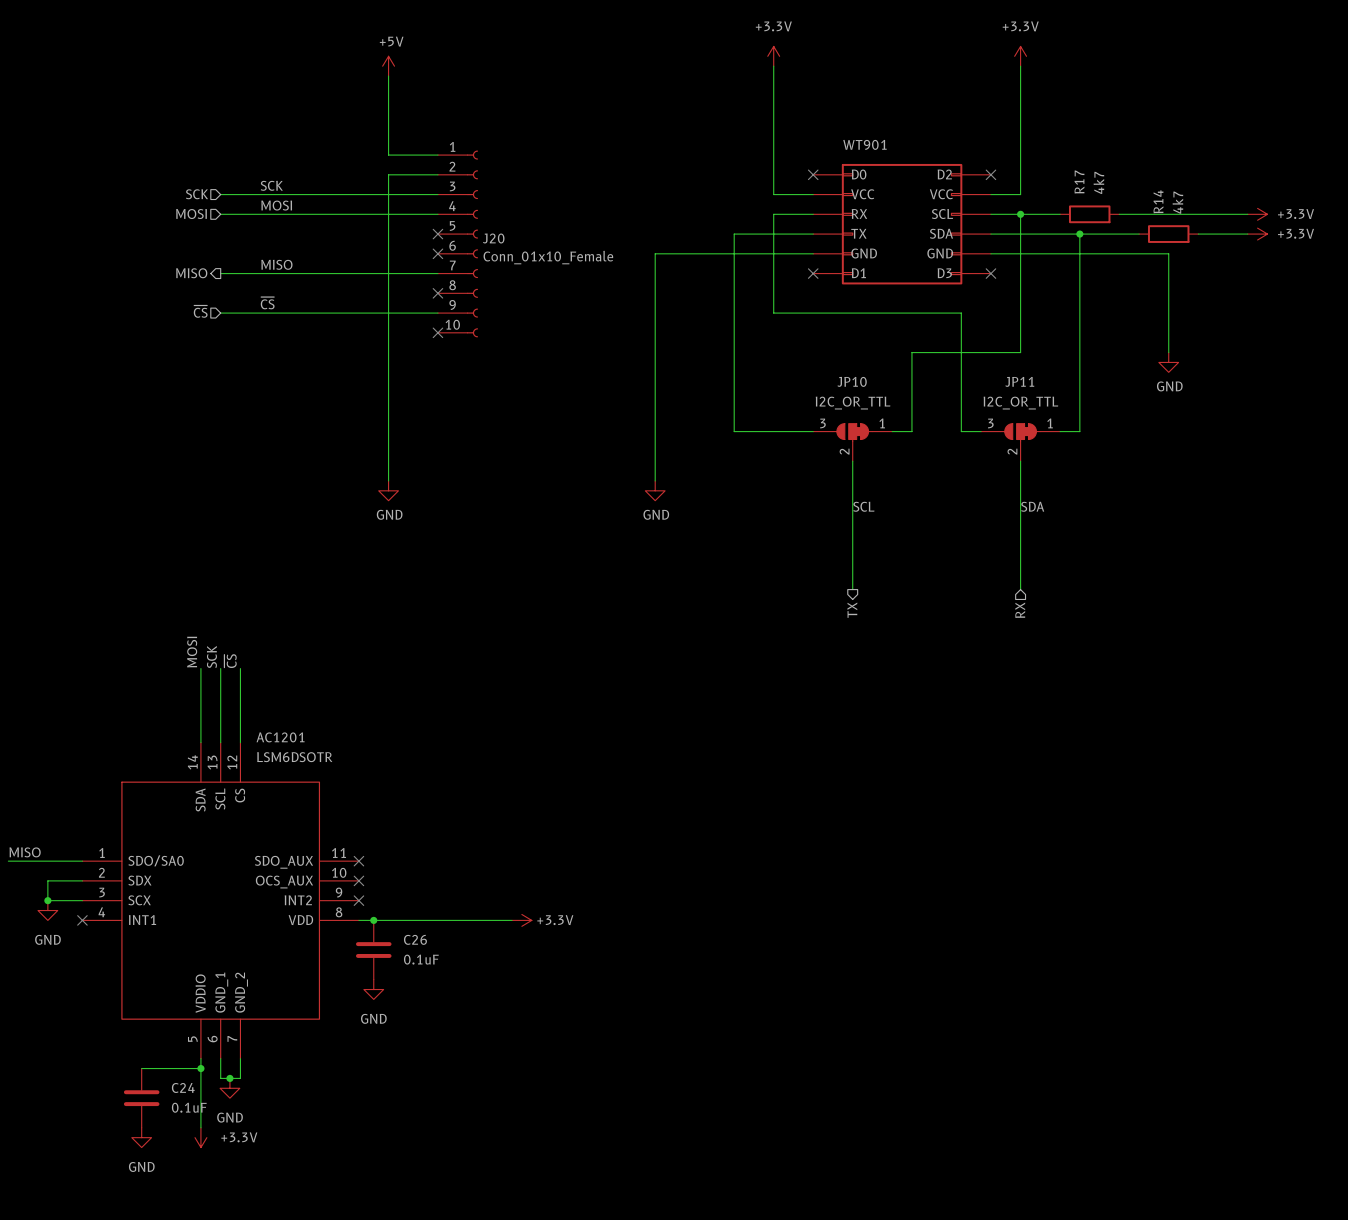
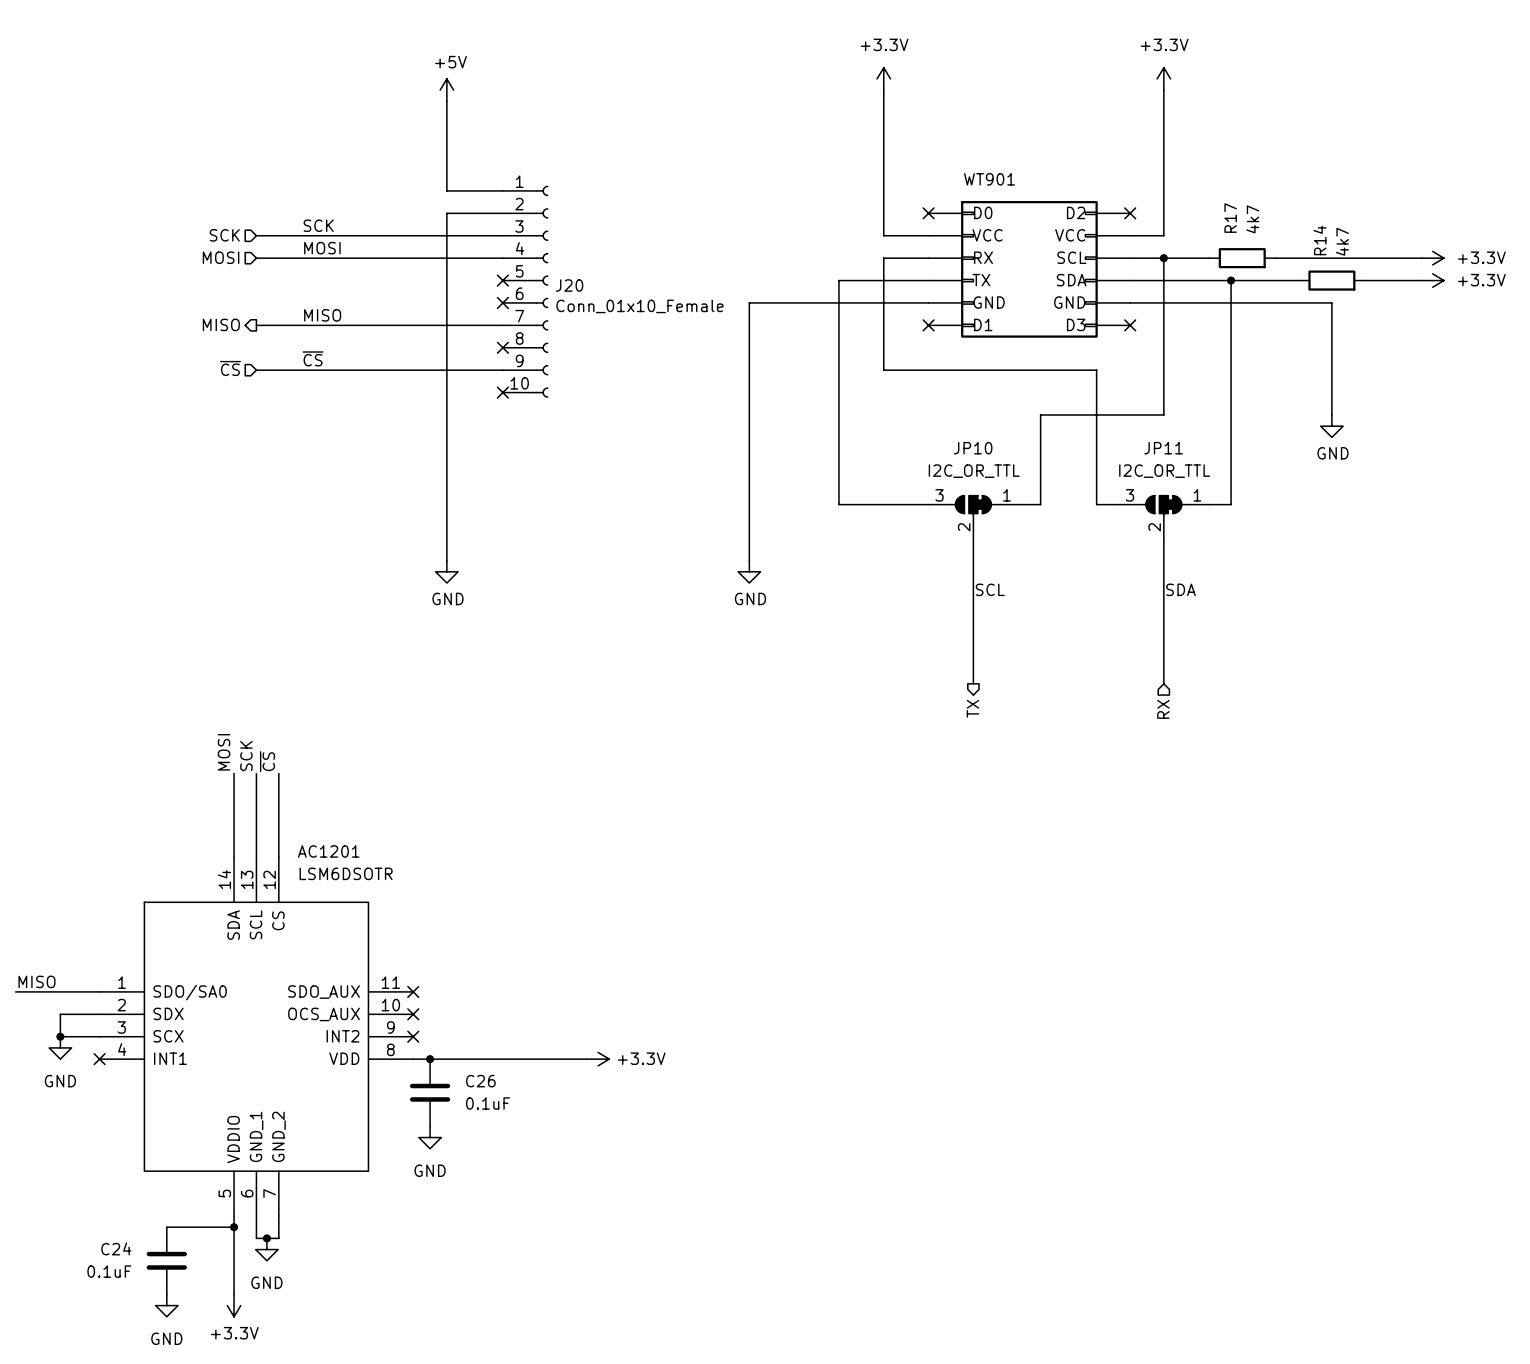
C24 name position: C24 (183, 1087) -> C24 (116, 1248)
C24 value position: 0.1uF (189, 1107) -> 0.1uF (109, 1271)
power symbol text position: +3.3V (239, 1137) -> +3.3V (234, 1333)

